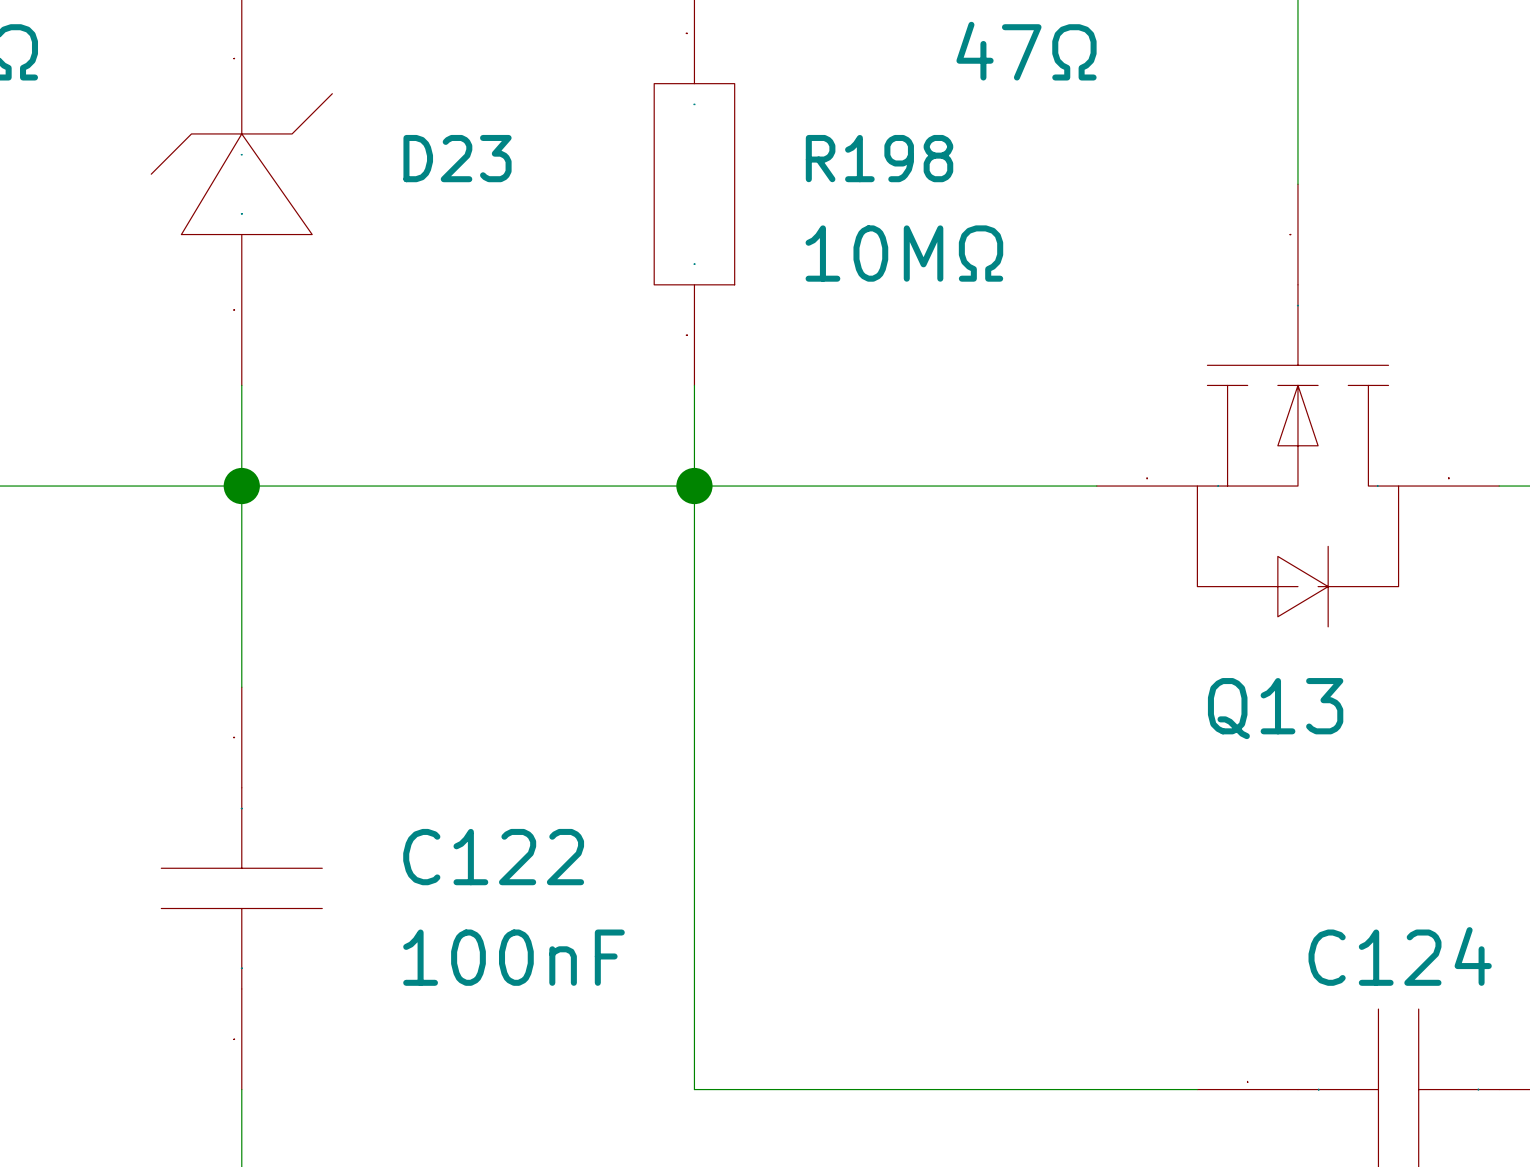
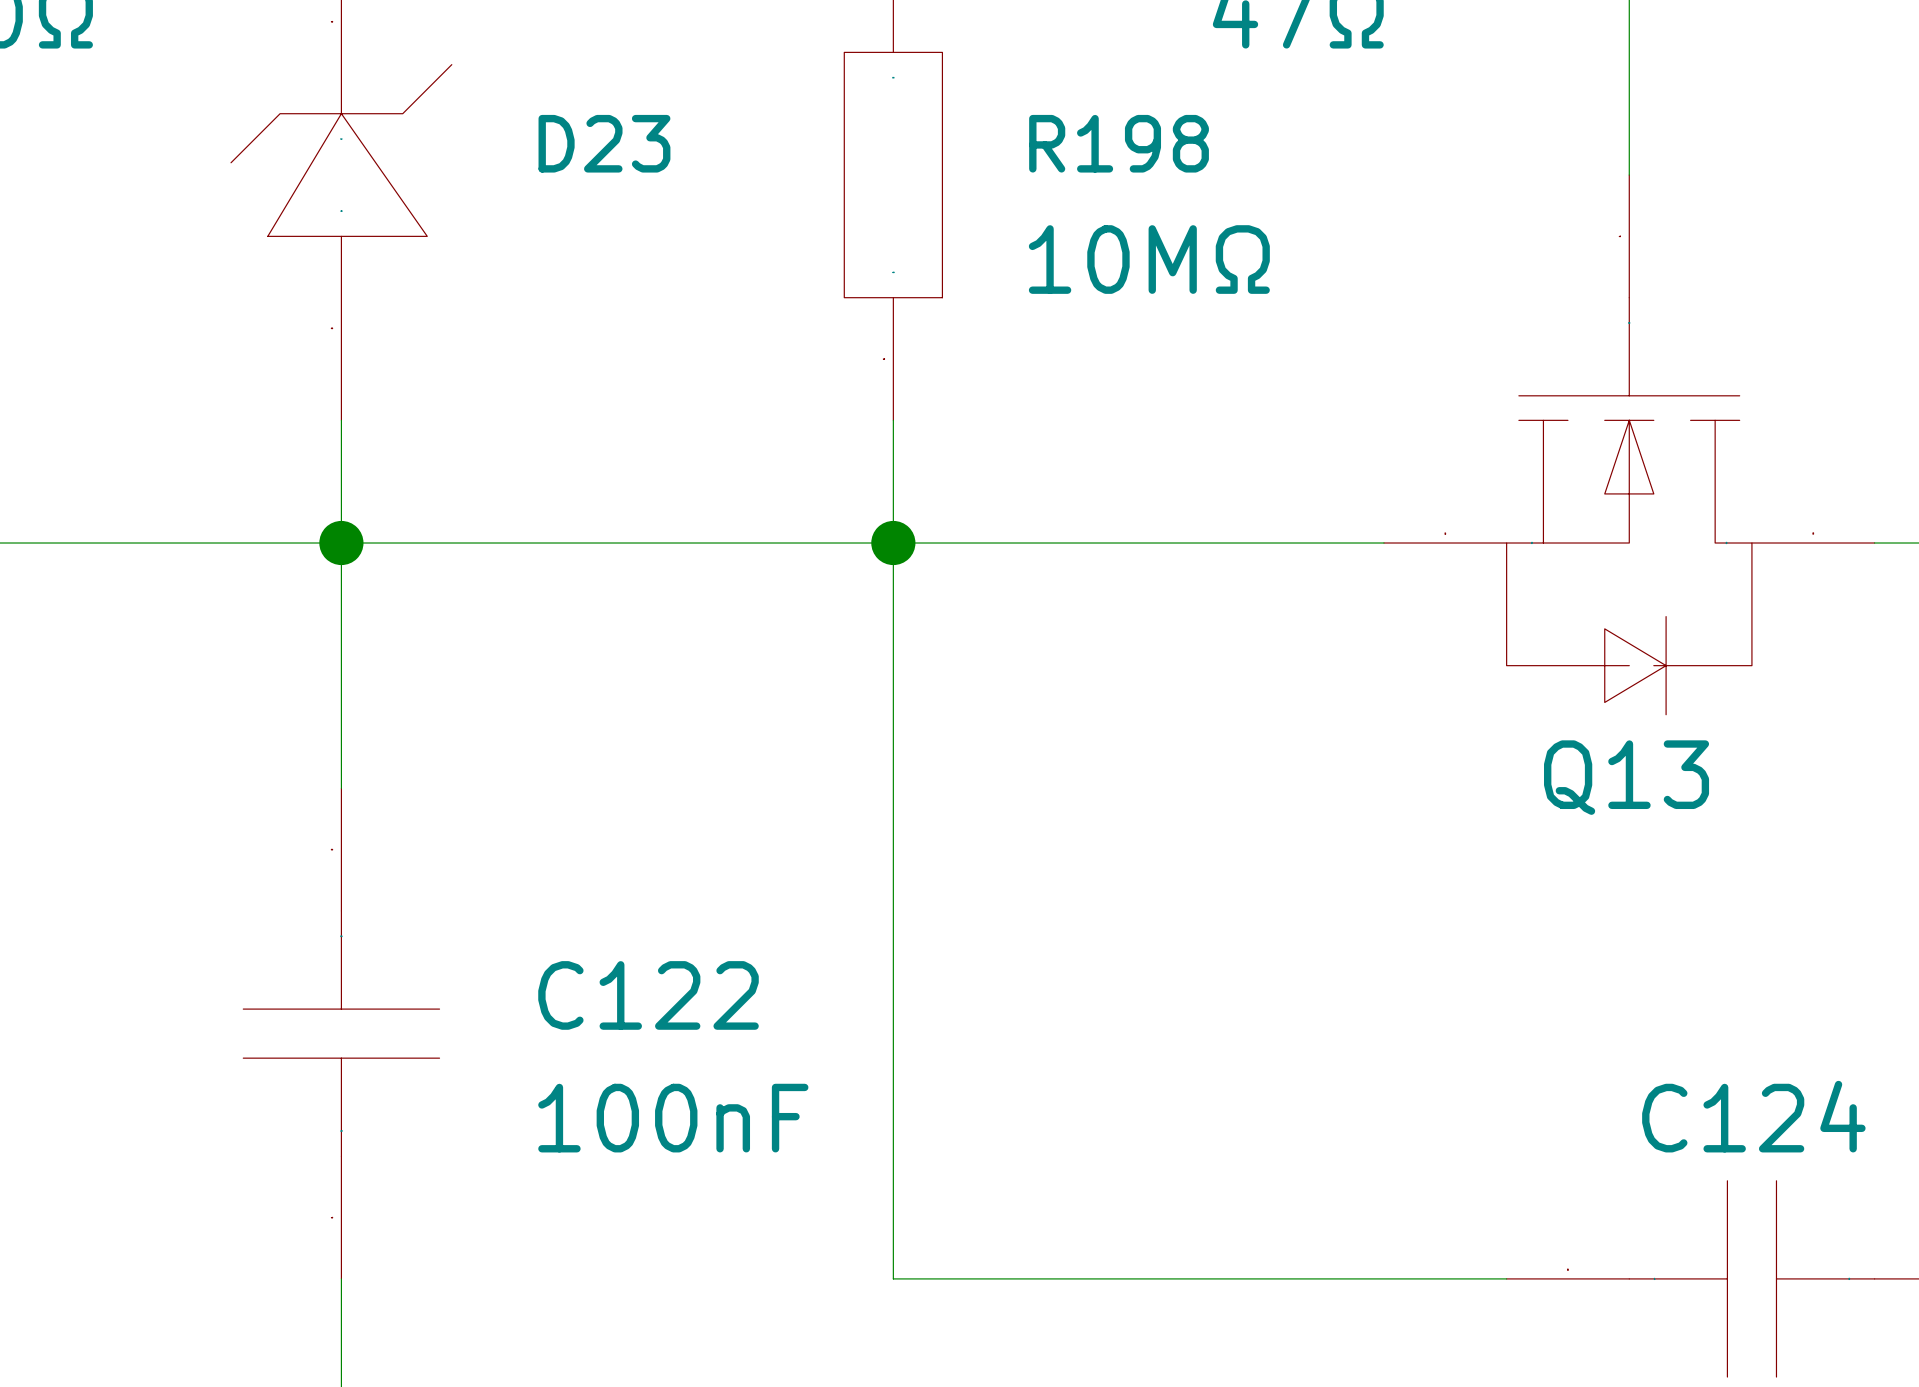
Q13 name position: Q13 (1275, 708) -> Q13 (1626, 777)

